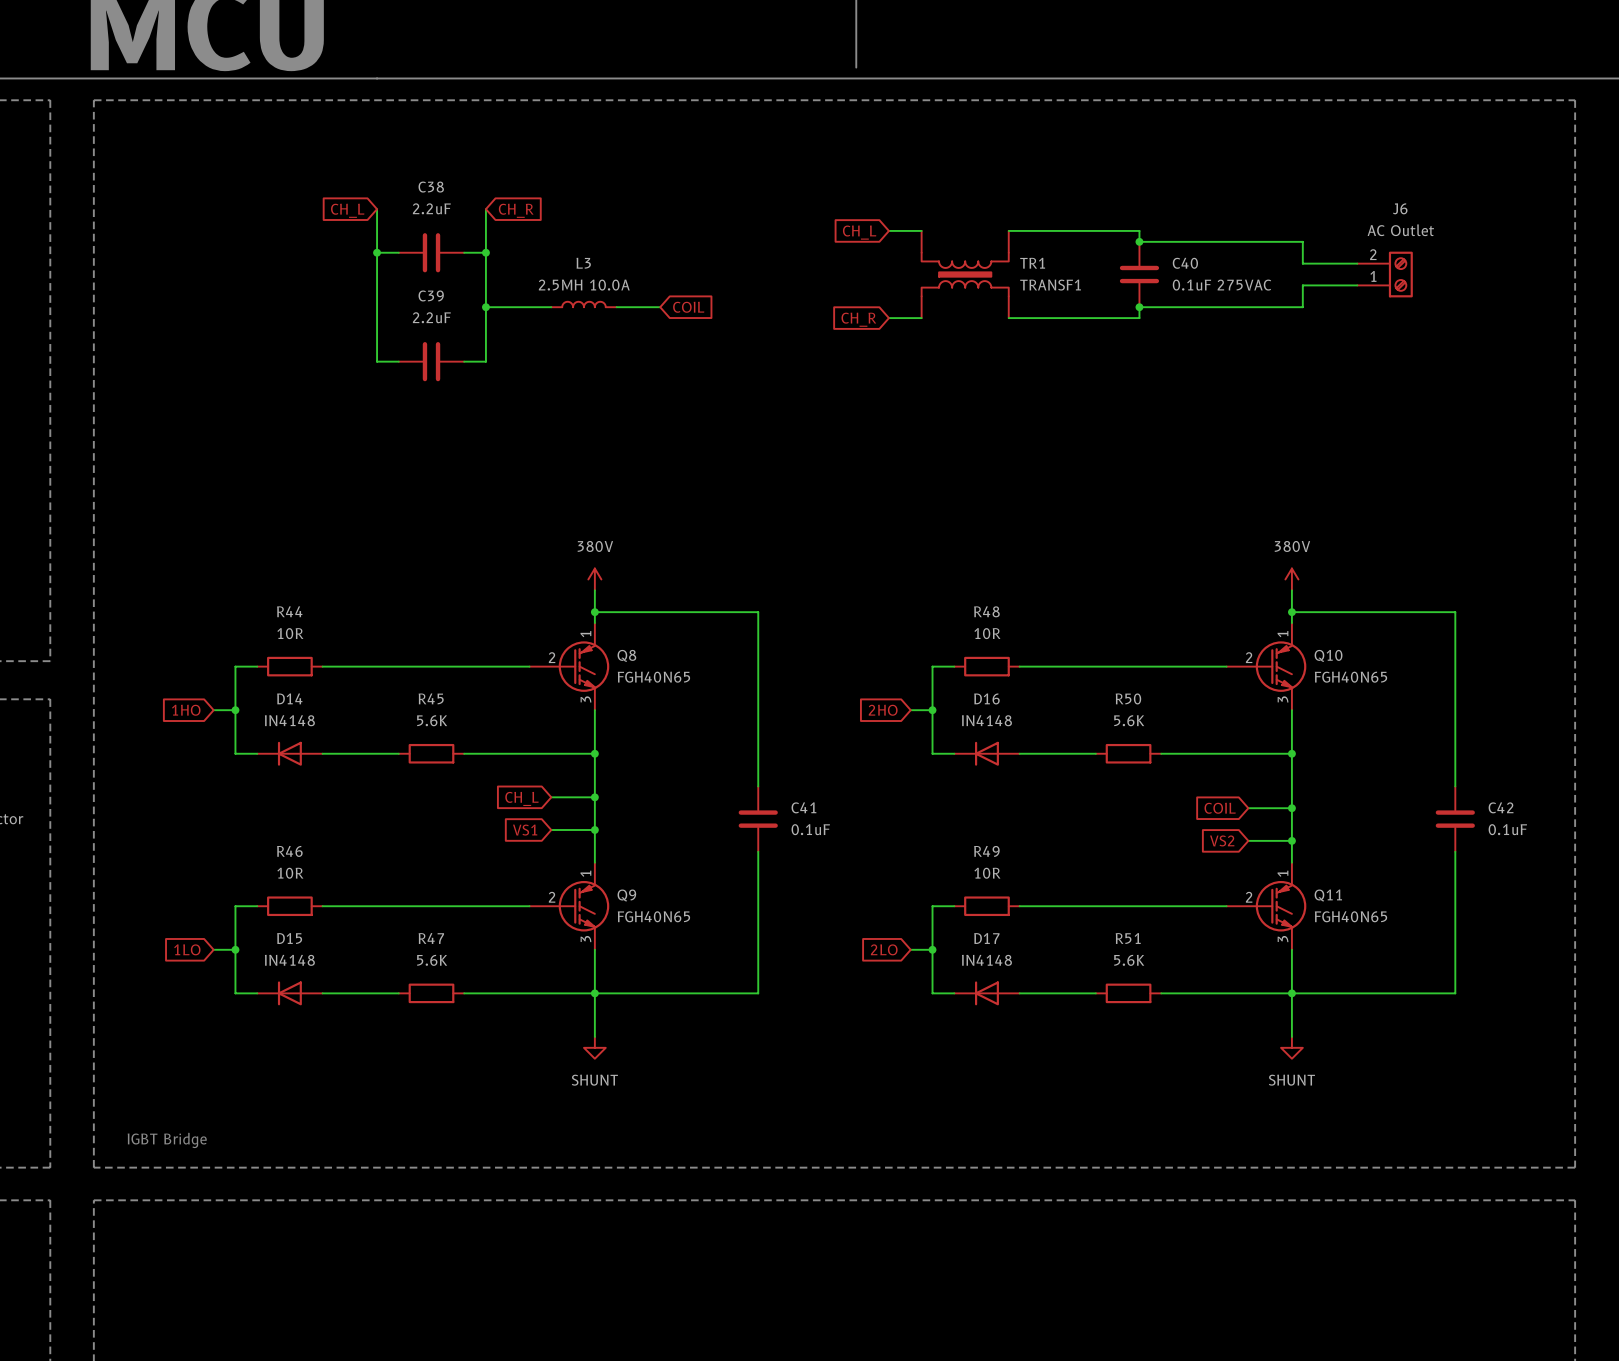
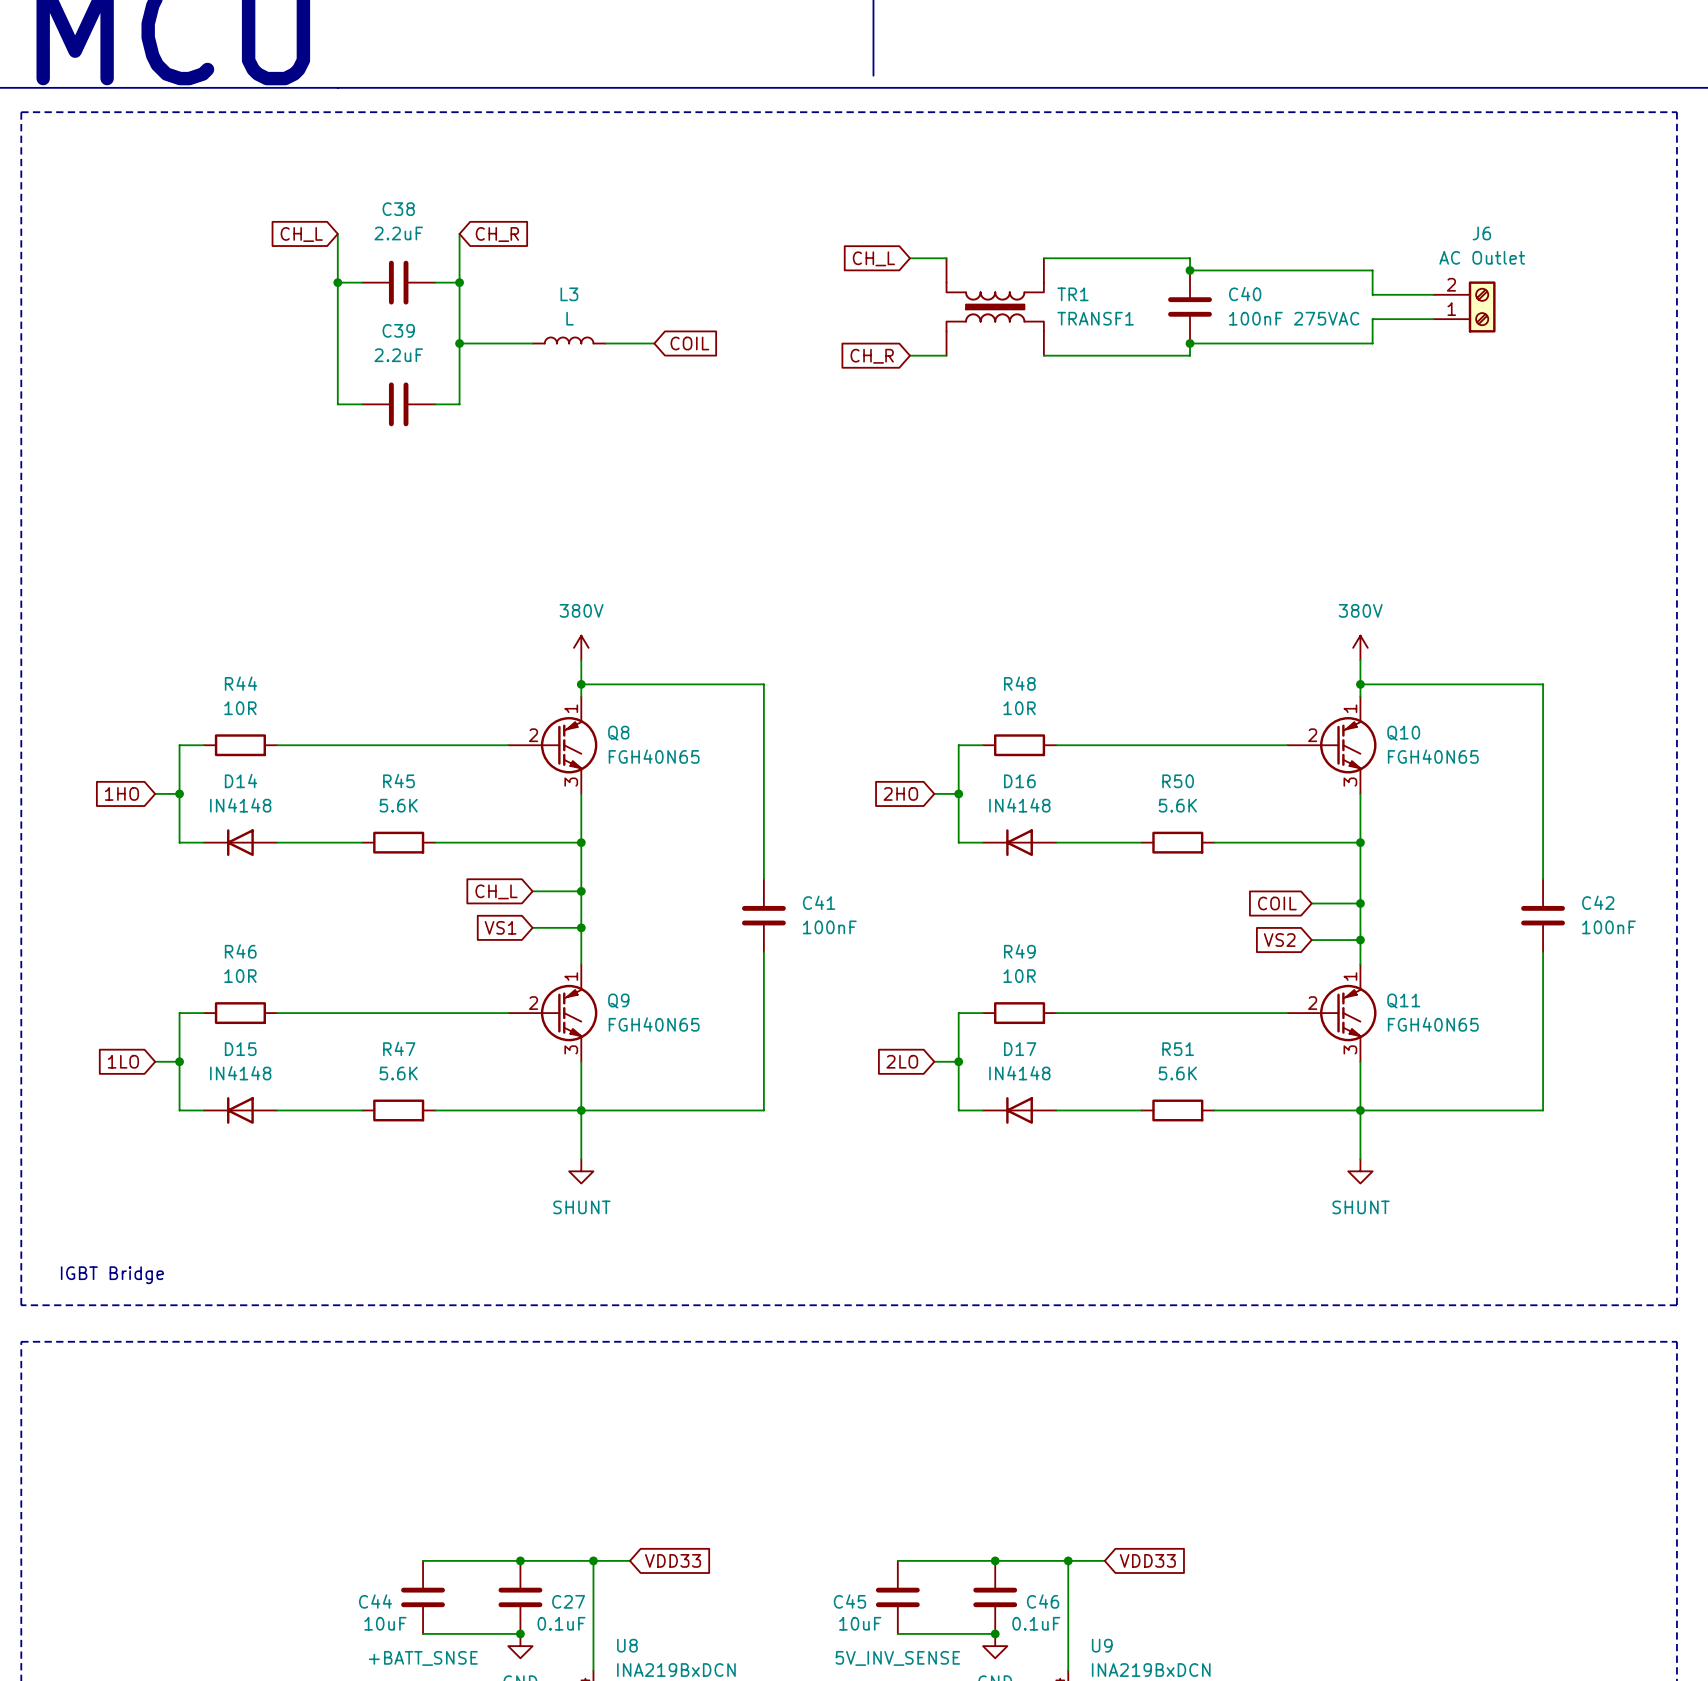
L3 value: 2.5MH 10.0A (584, 285) -> L (569, 318)
C40 value: 0.1uF 275VAC (1221, 285) -> 100nF 275VAC (1294, 318)
C41 value: 0.1uF (810, 829) -> 100nF (829, 927)
C42 value: 0.1uF (1507, 829) -> 100nF (1608, 927)

